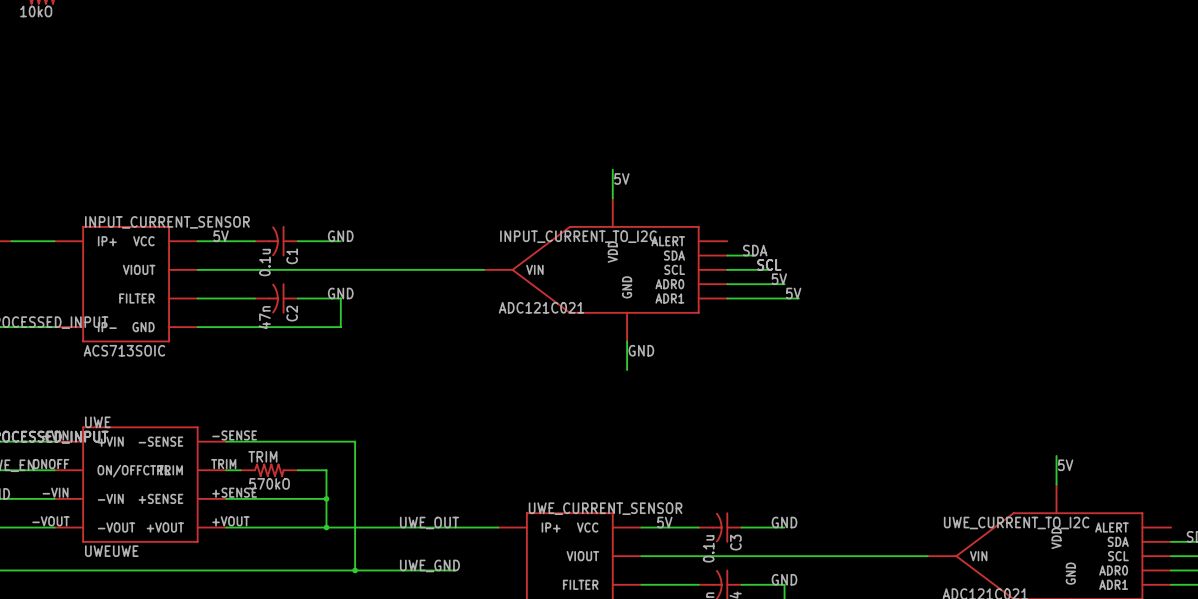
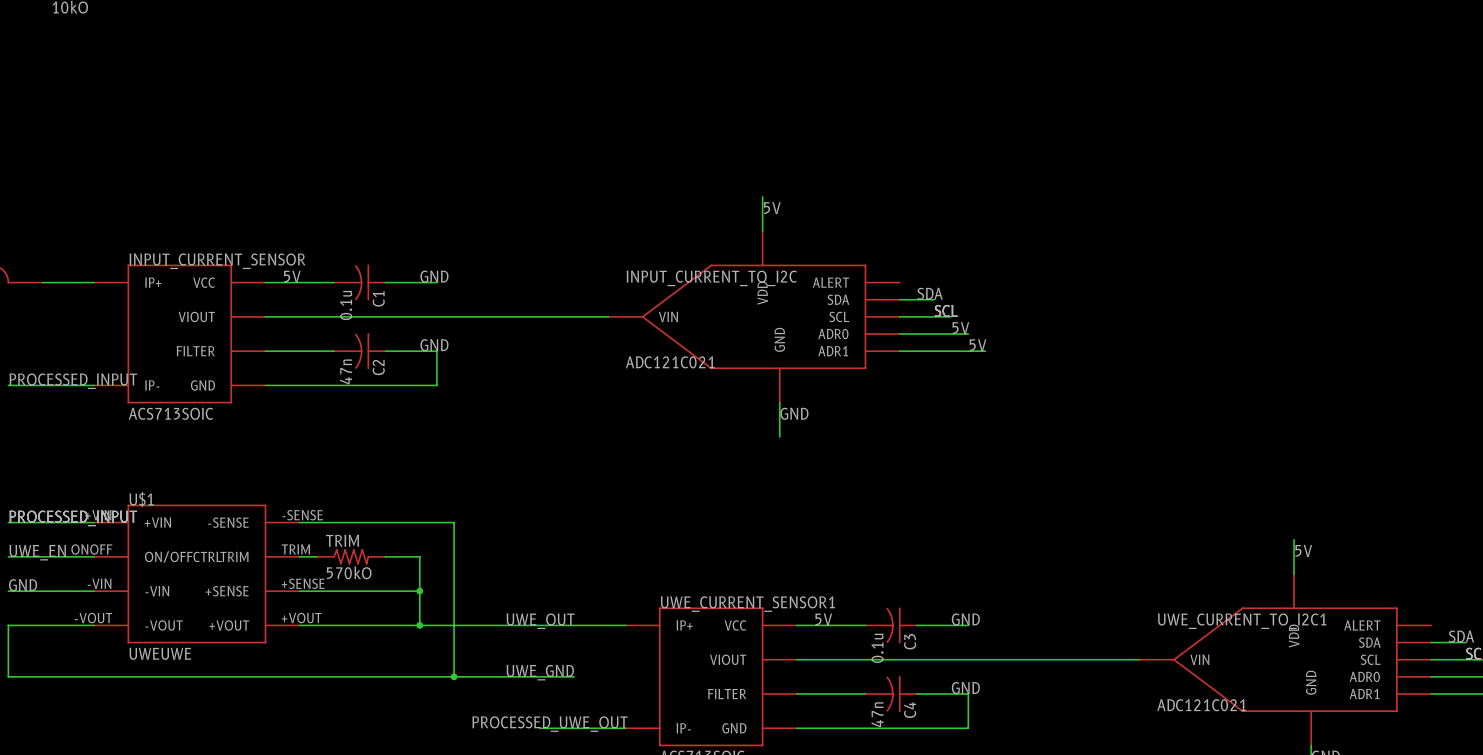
UWE name: UWE (97, 422) -> U$1 (141, 499)
UWE_CURRENT_SENSOR name: UWE_CURRENT_SENSOR (605, 508) -> UWE_CURRENT_SENSOR1 (747, 604)
UWE_CURRENT_TO_I2C name: UWE_CURRENT_TO_I2C (1016, 523) -> UWE_CURRENT_TO_I2C1 (1242, 621)

